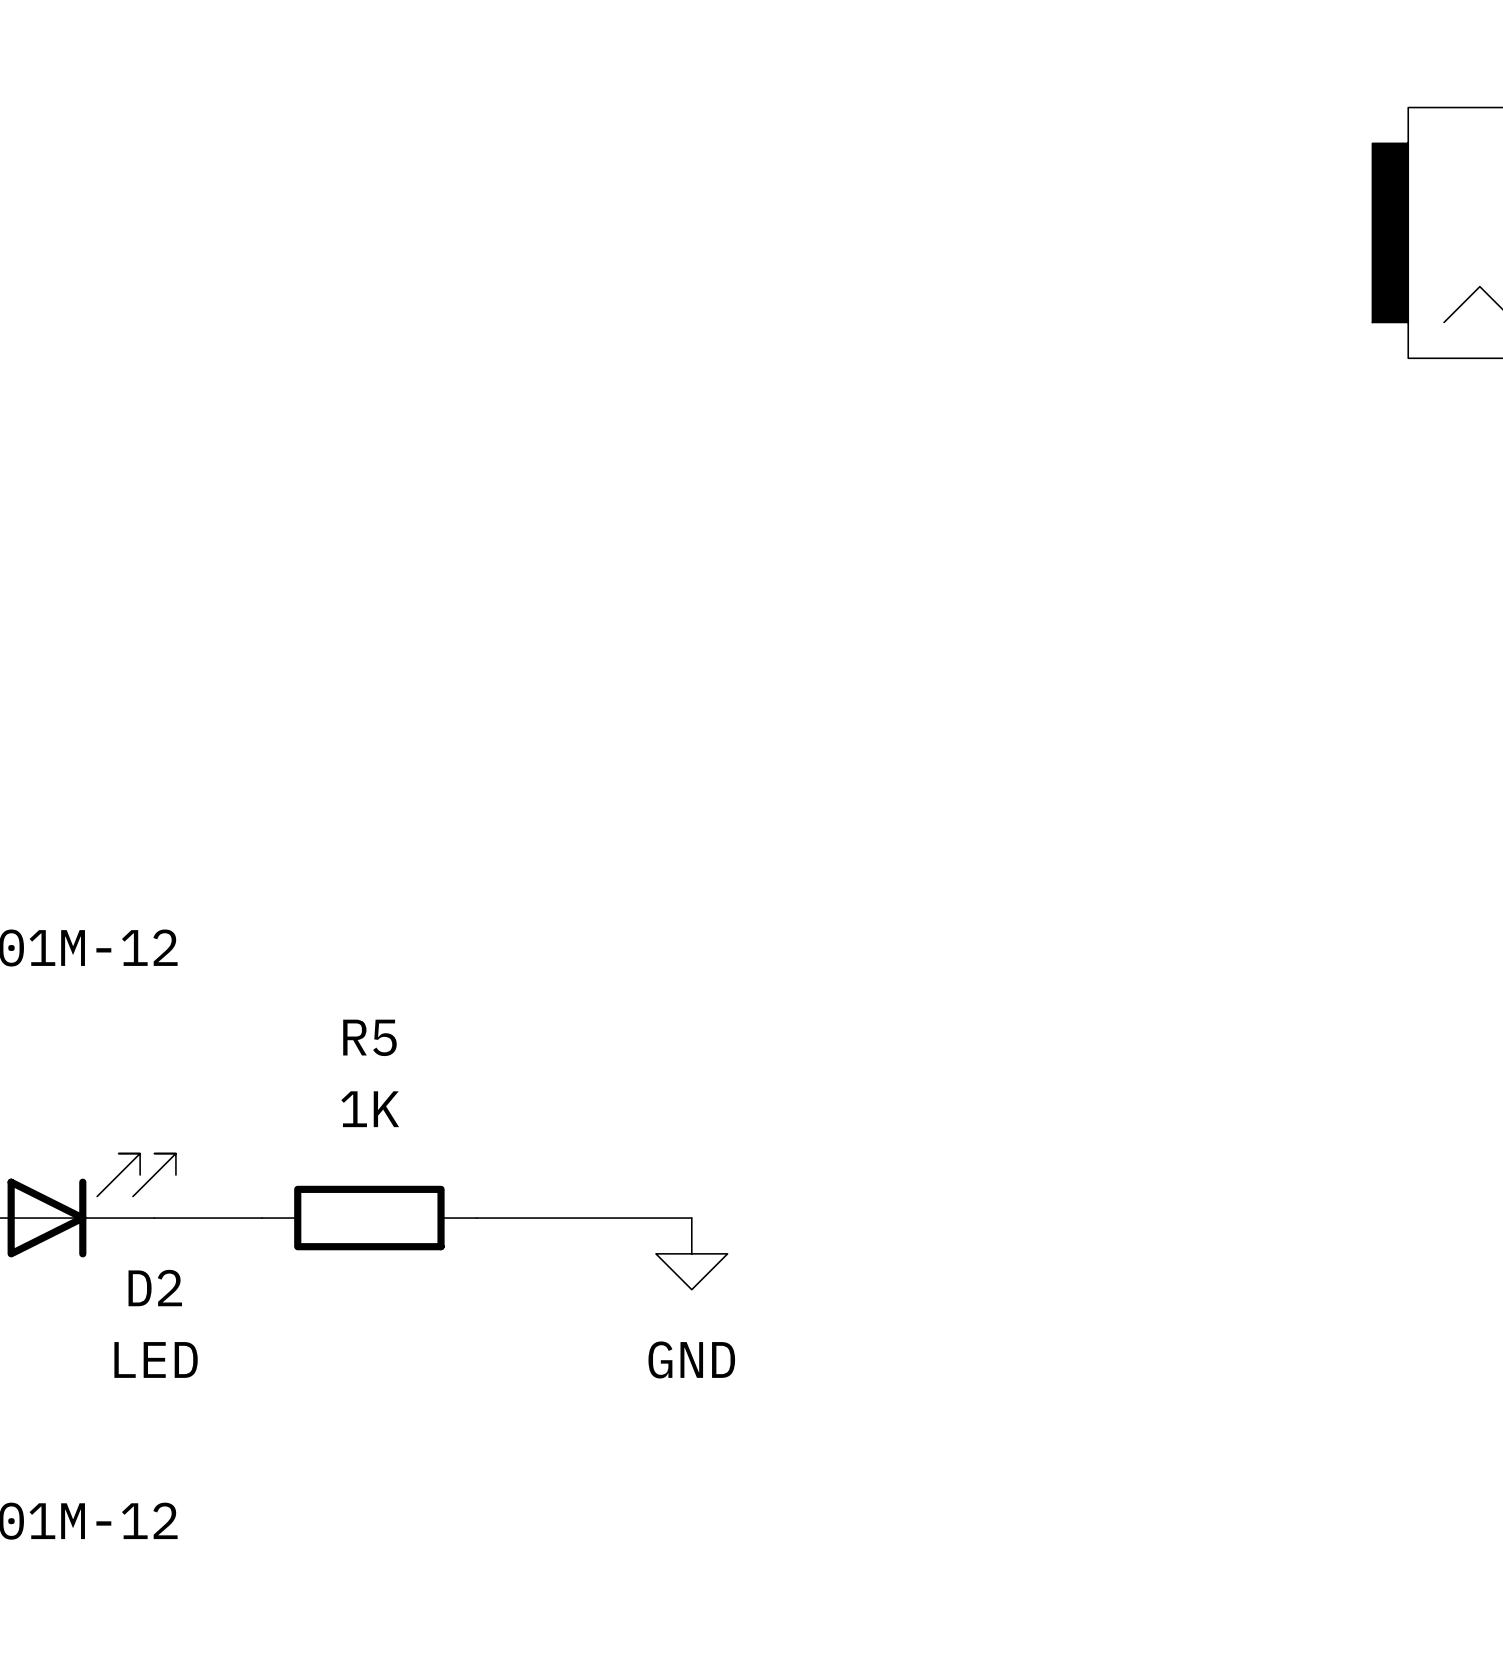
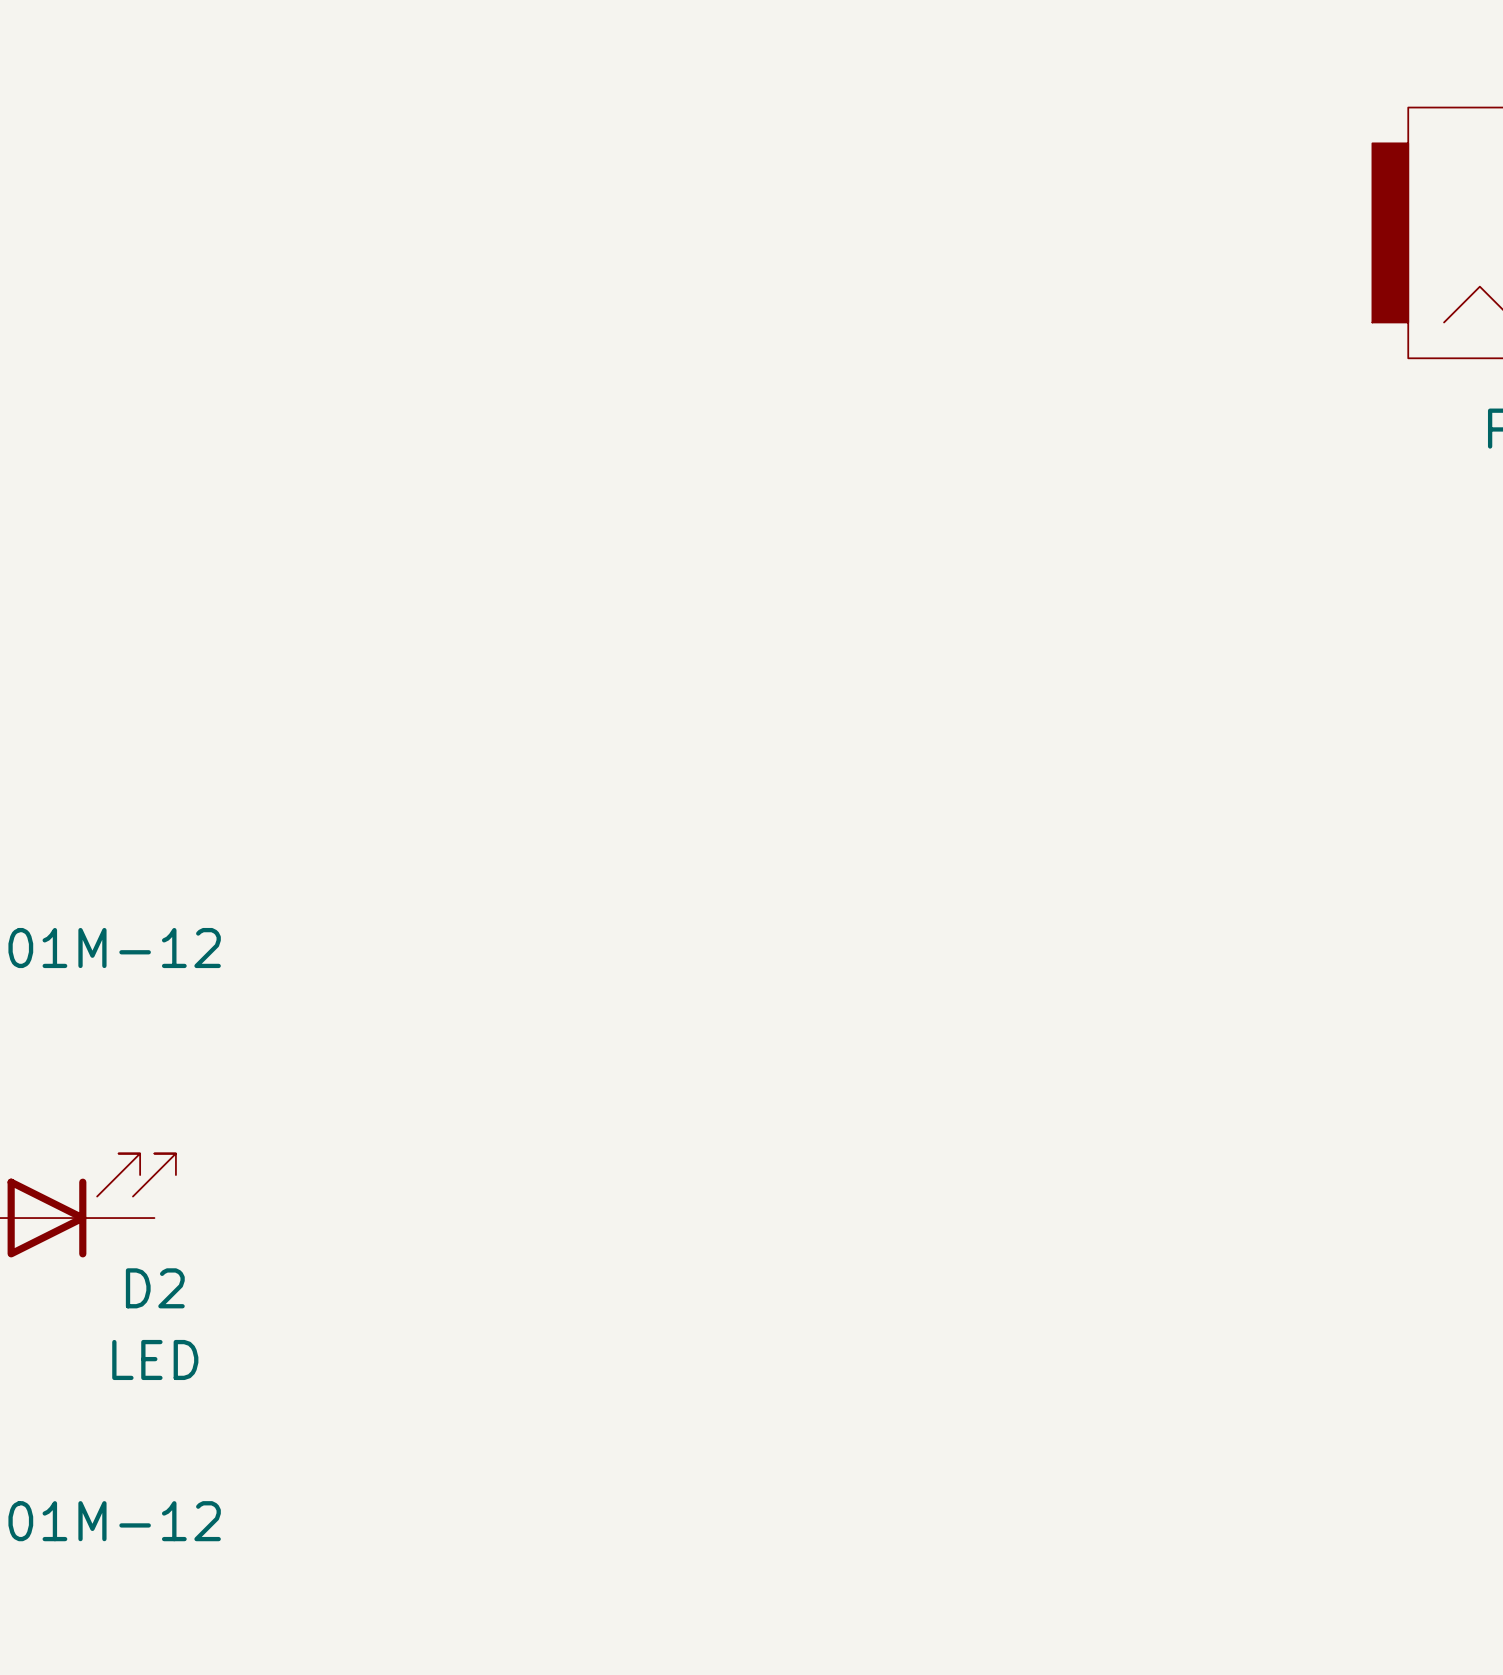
wire: (154, 1218) (261, 1218) -> none
R5: 1K (369, 1218) -> none
wire: (476, 1218) (691, 1218) -> none
power symbol: GND (691, 1253) -> none

